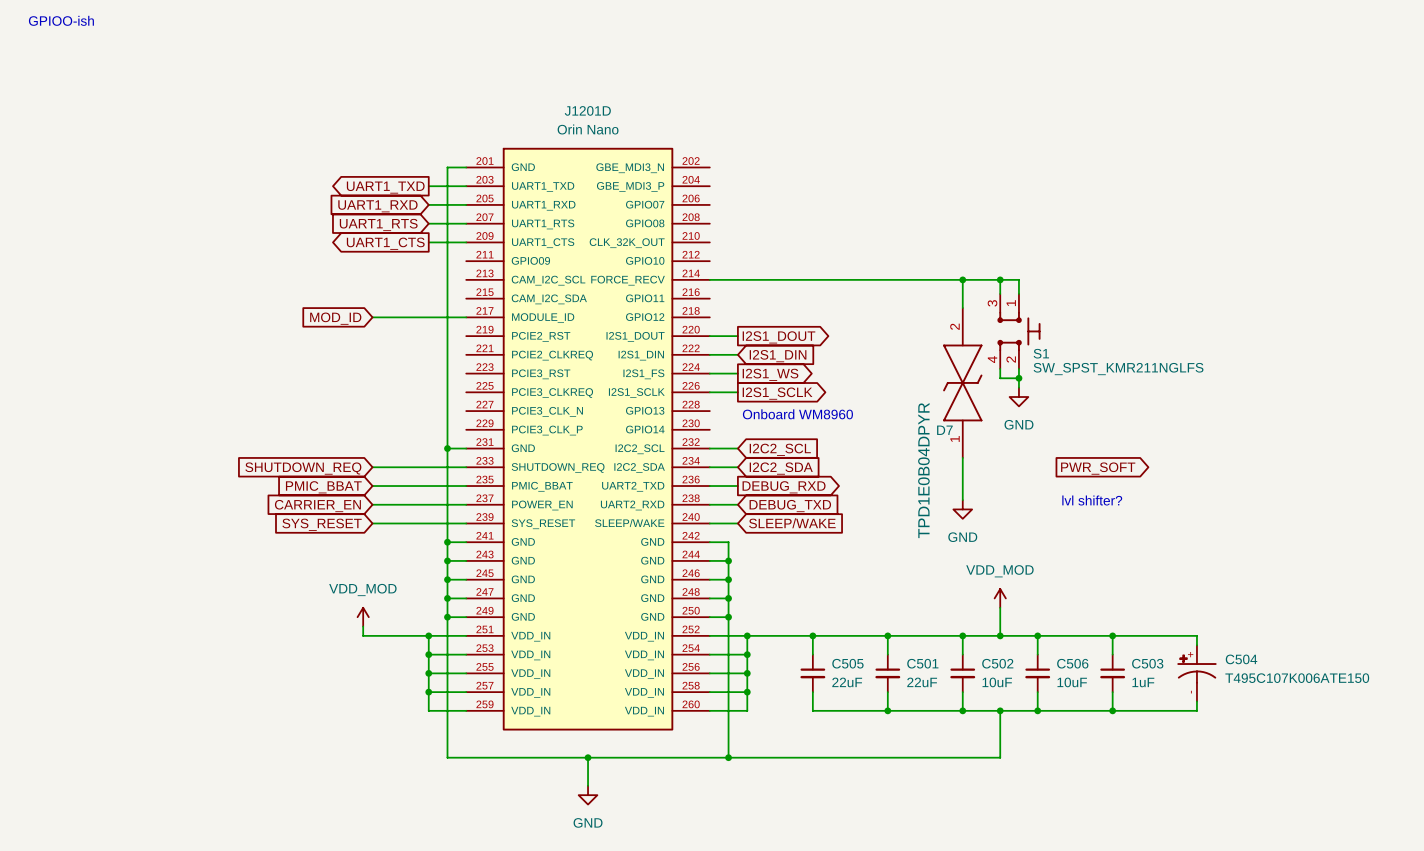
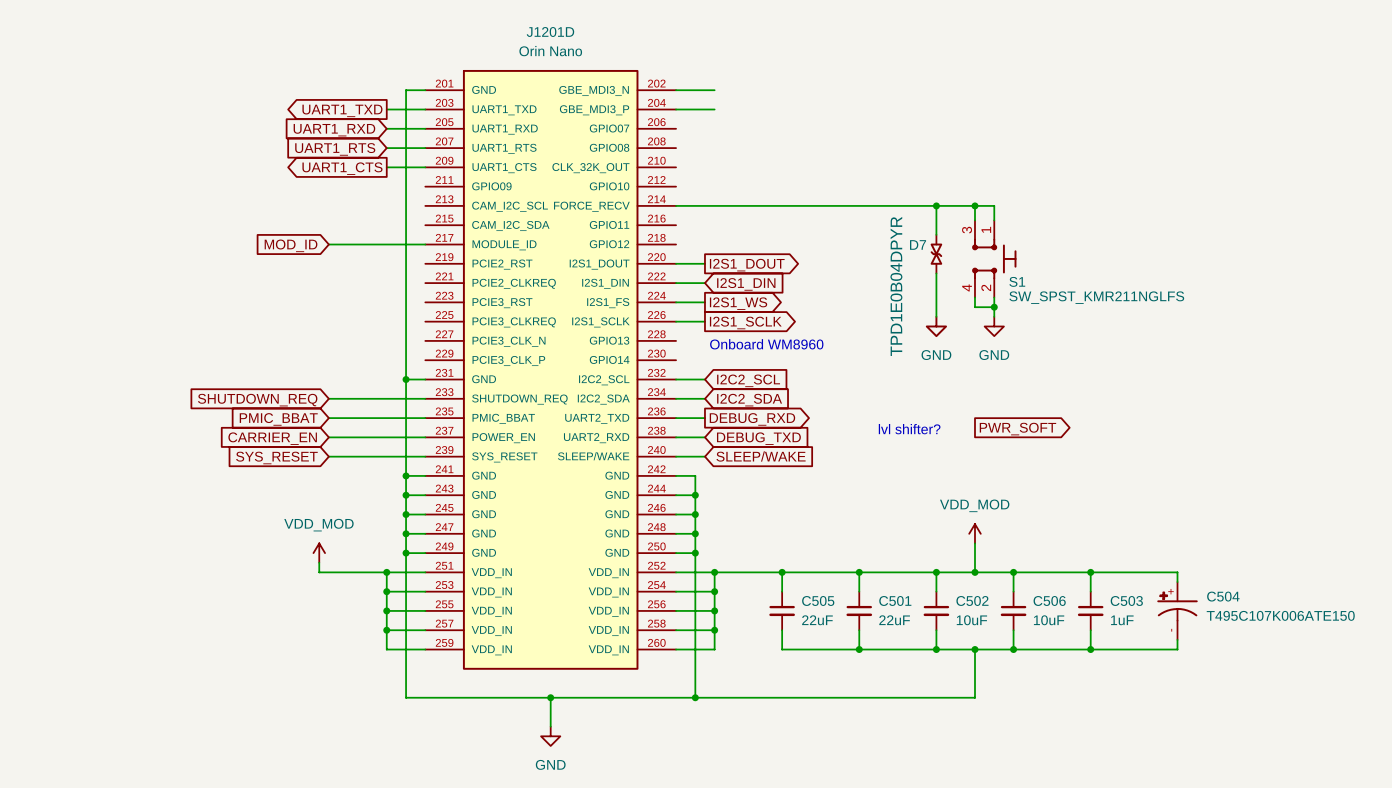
wire: none -> (676, 90) (714, 90)
wire: none -> (676, 109) (714, 109)
D7 symbol: [943, 308, 983, 458] -> [930, 234, 943, 274]
power symbol: none -> GND (936, 326)
D7 name position: D7 (944, 430) -> D7 (918, 244)
wire: (962, 457) (962, 500) -> (936, 273) (936, 316)
global label position: PWR_SOFT (1098, 468) -> PWR_SOFT (1017, 429)
D7 text position: TPD1E0B04DPYR (923, 470) -> TPD1E0B04DPYR (896, 286)
text position: lvl shifter? (1092, 500) -> lvl shifter? (909, 429)
power symbol: GND (962, 509) -> none

